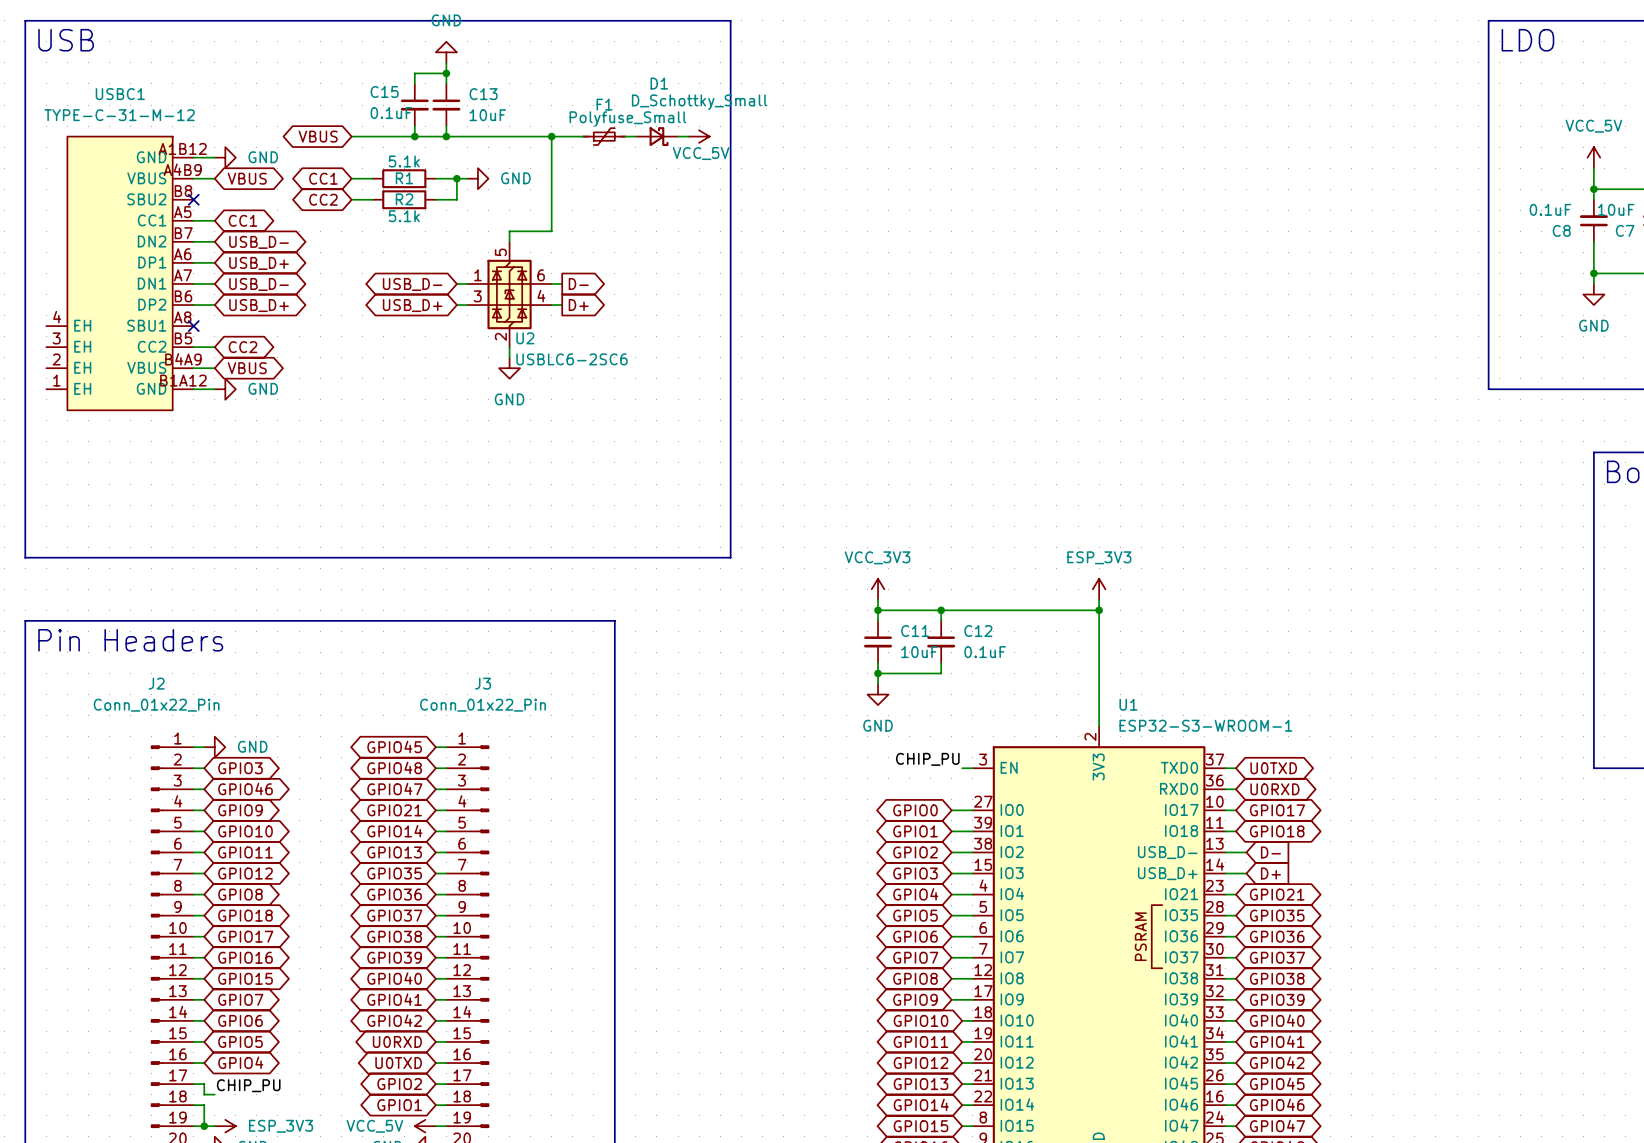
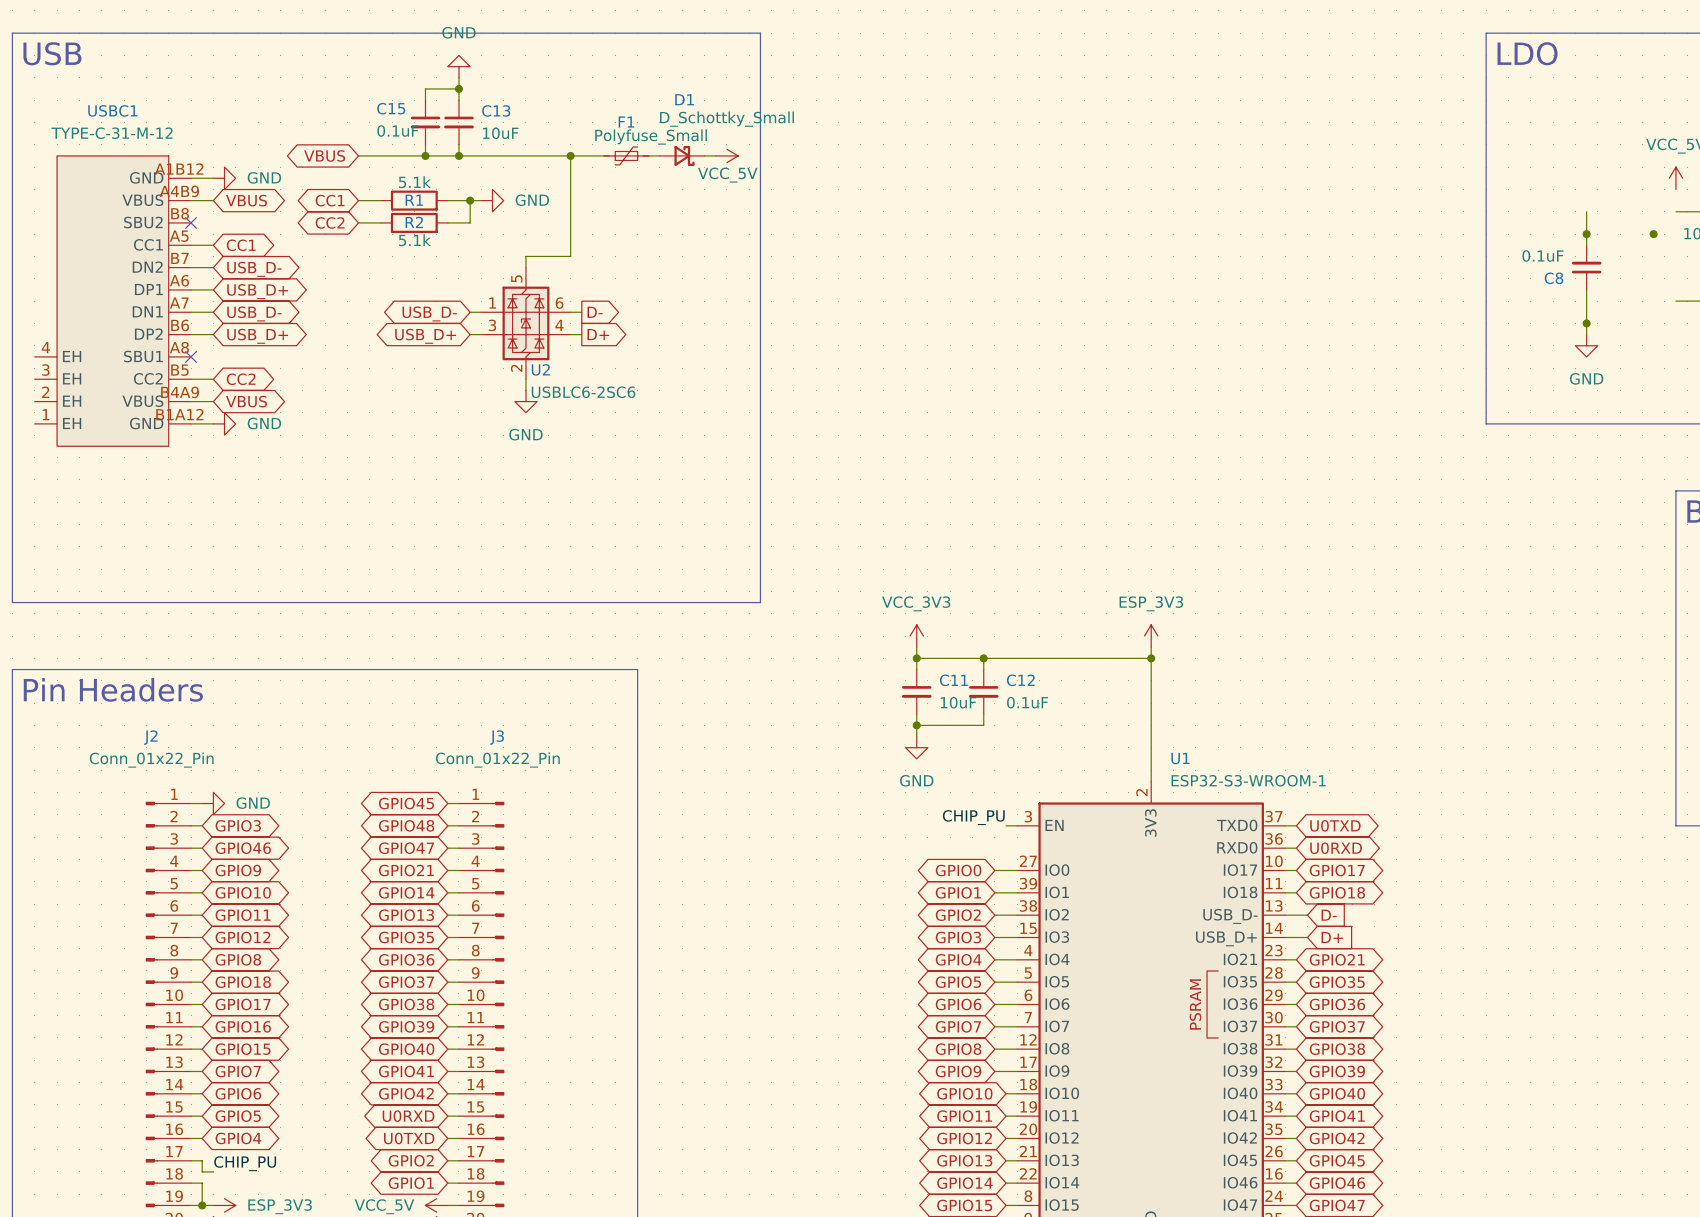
line: (1488, 20) (1488, 389) -> (1564, 33) (1486, 33) (1486, 423) (1564, 423)
text position: LDO (1527, 40) -> LDO (1527, 53)
wire: (1593, 168) (1593, 199) -> (1586, 211) (1586, 245)
junction position: (1593, 189) -> (1653, 234)
junction: none -> (1586, 234)
C8 position: (1593, 220) -> (1586, 267)
wire: (1593, 241) (1593, 283) -> (1586, 289) (1586, 334)
junction: (1593, 273) -> none
junction: none -> (1586, 323)
power symbol position: GND (1593, 294) -> GND (1586, 345)

